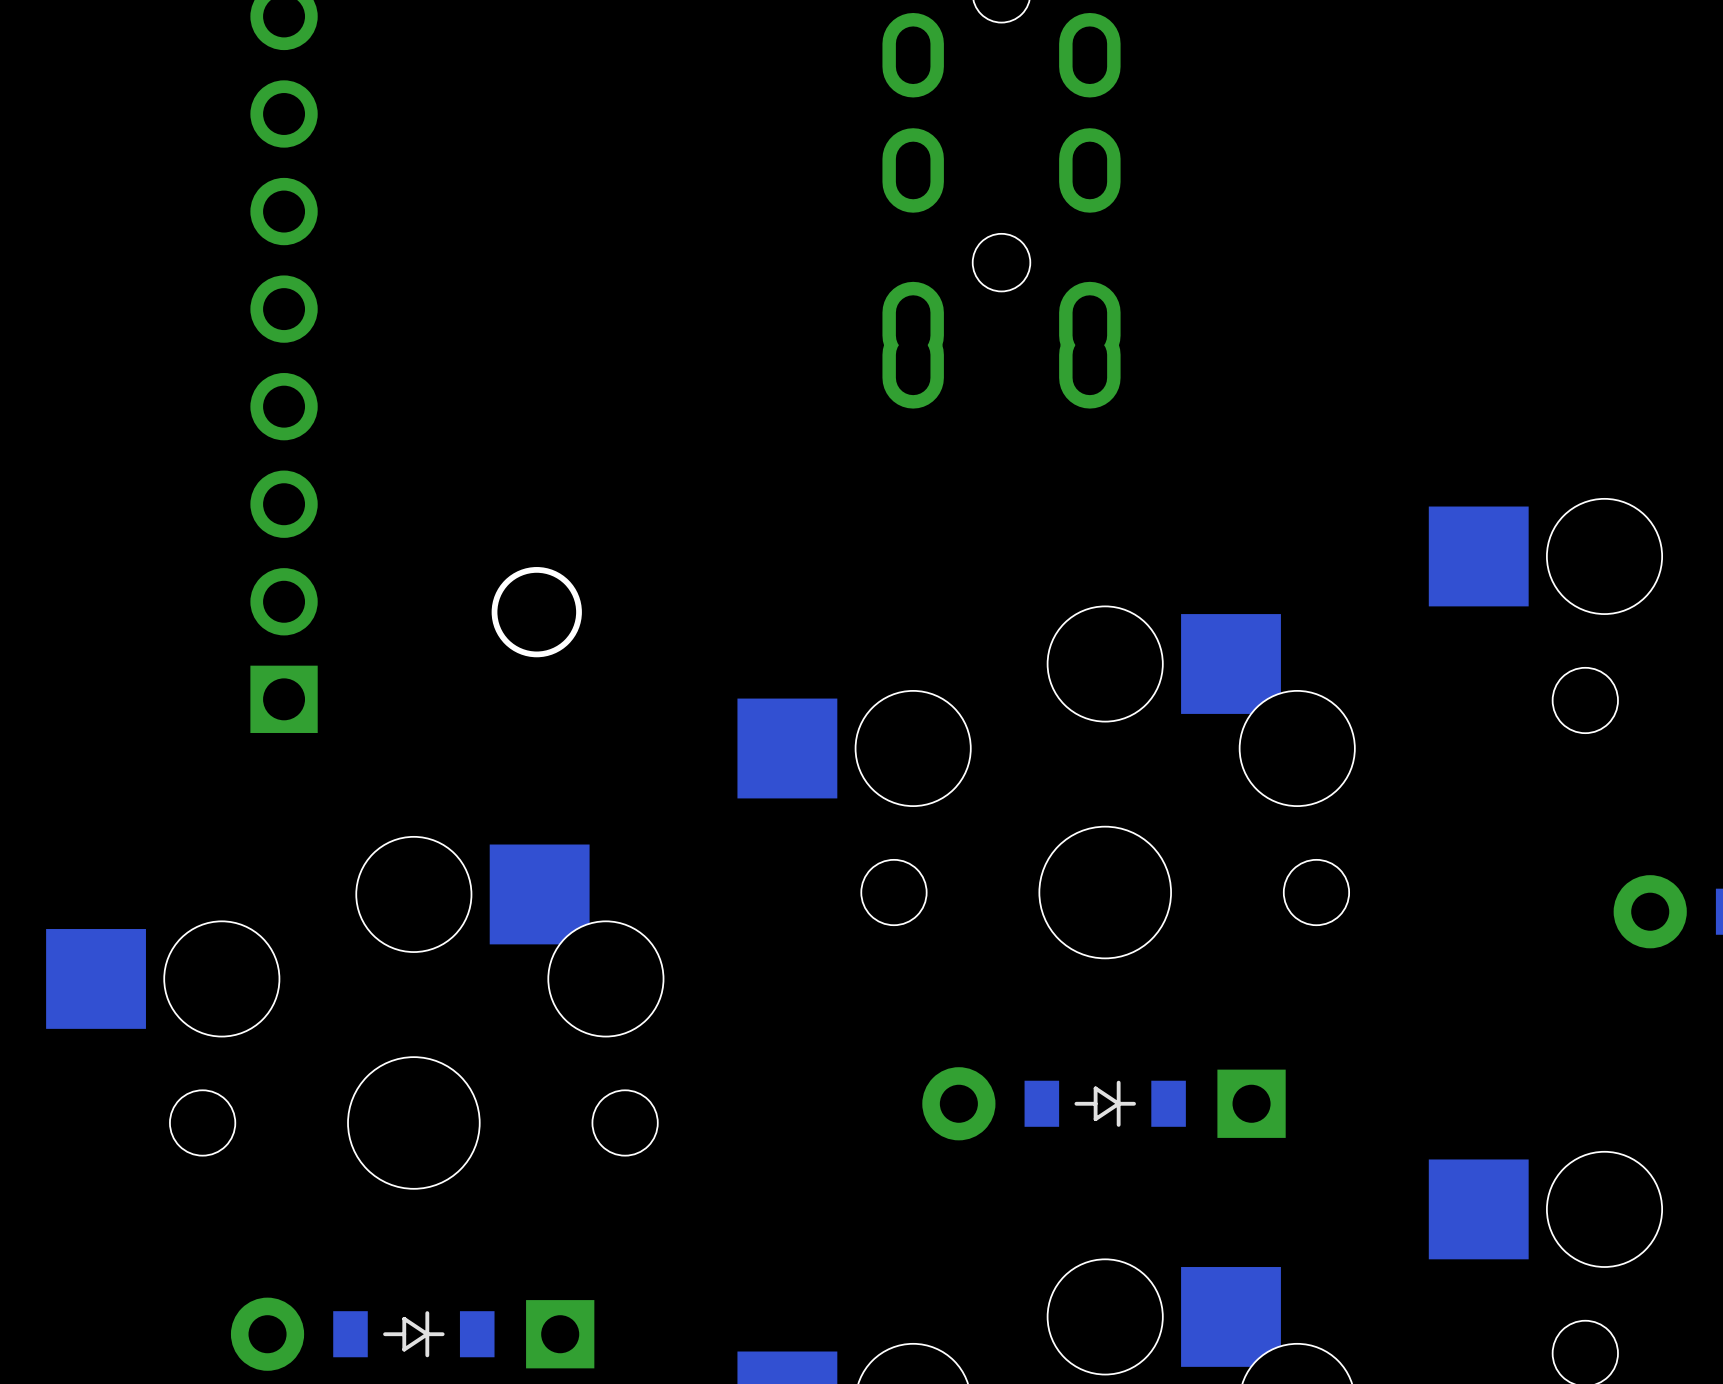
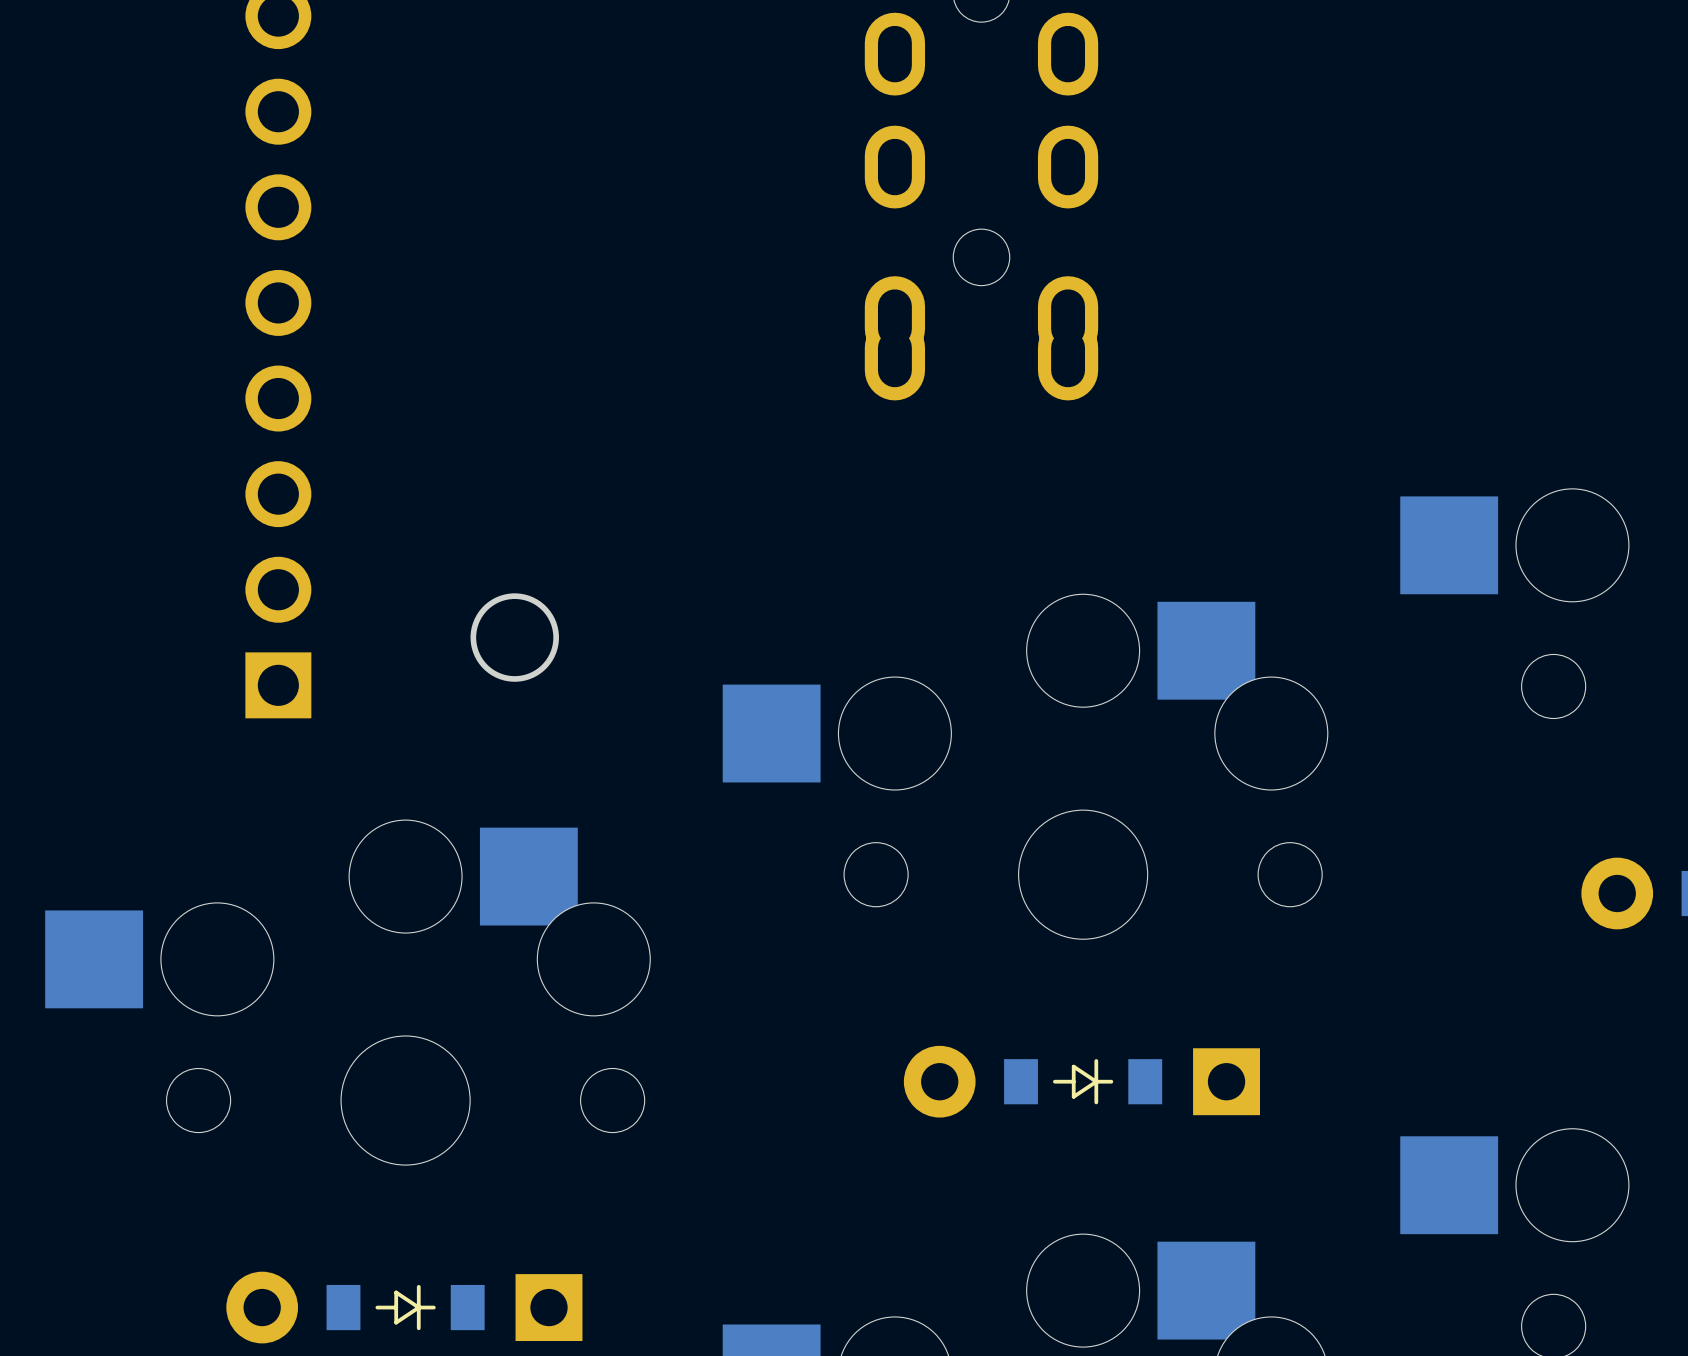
round board edge position: (536, 612) -> (514, 637)

